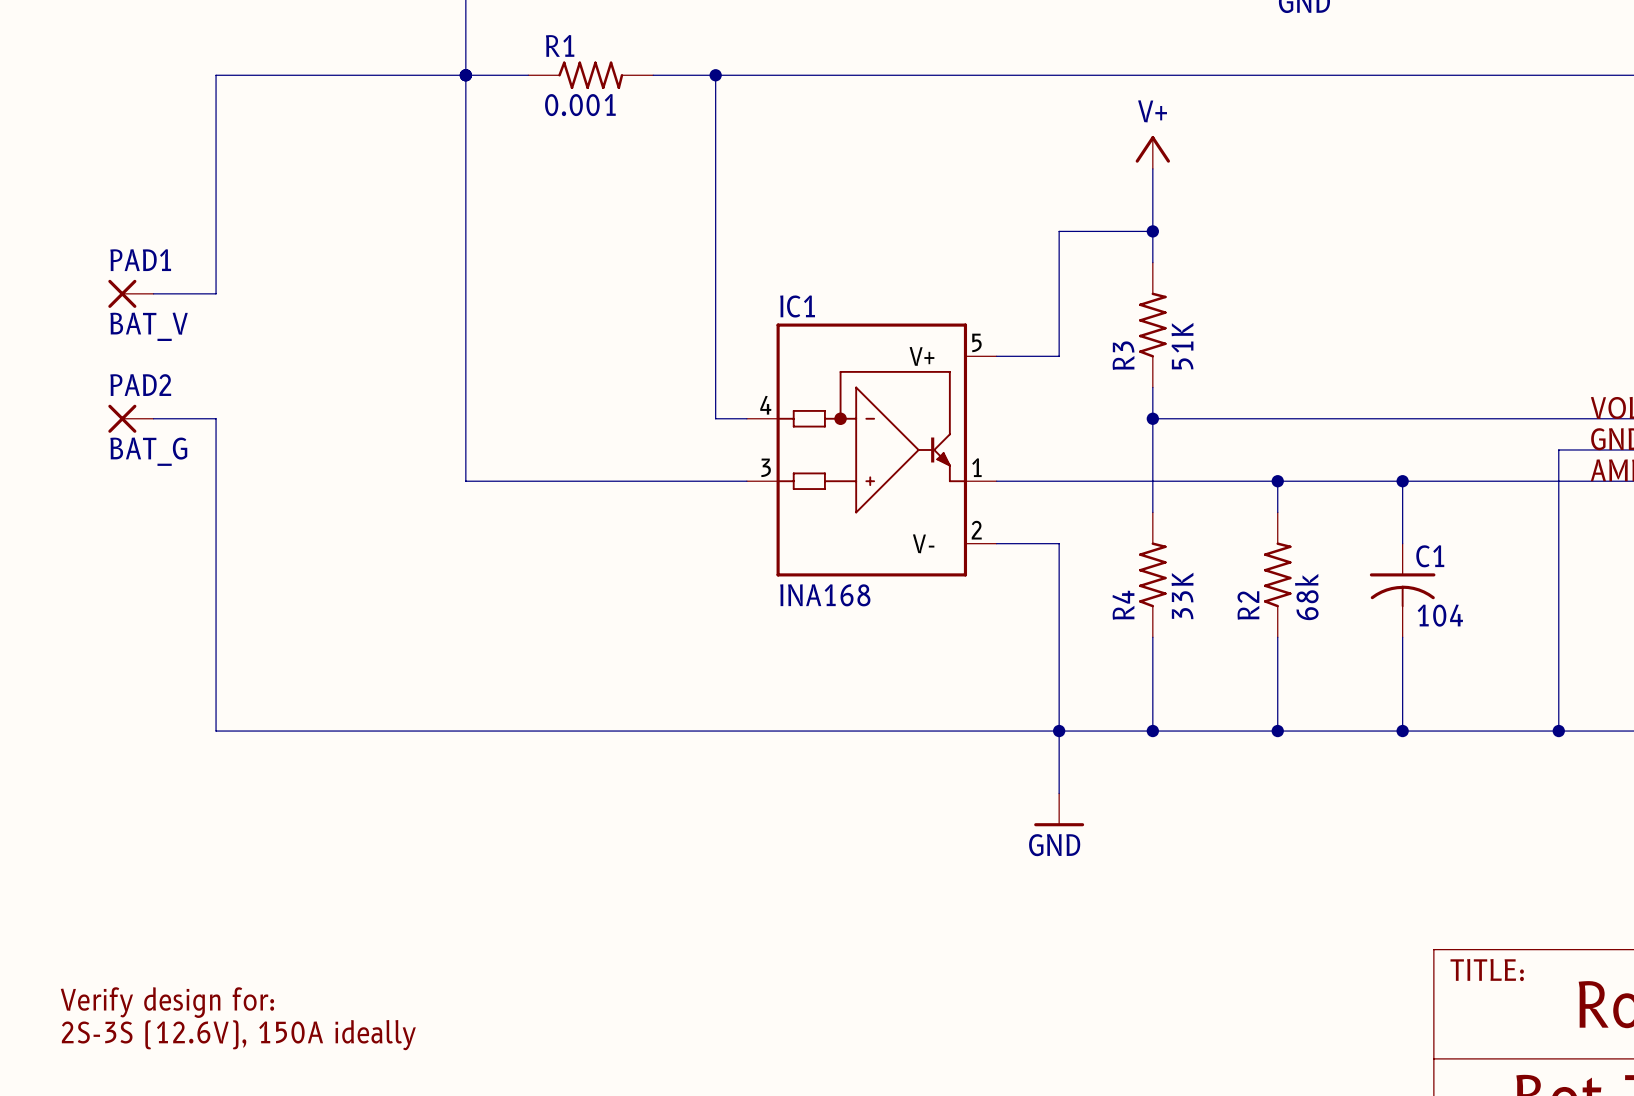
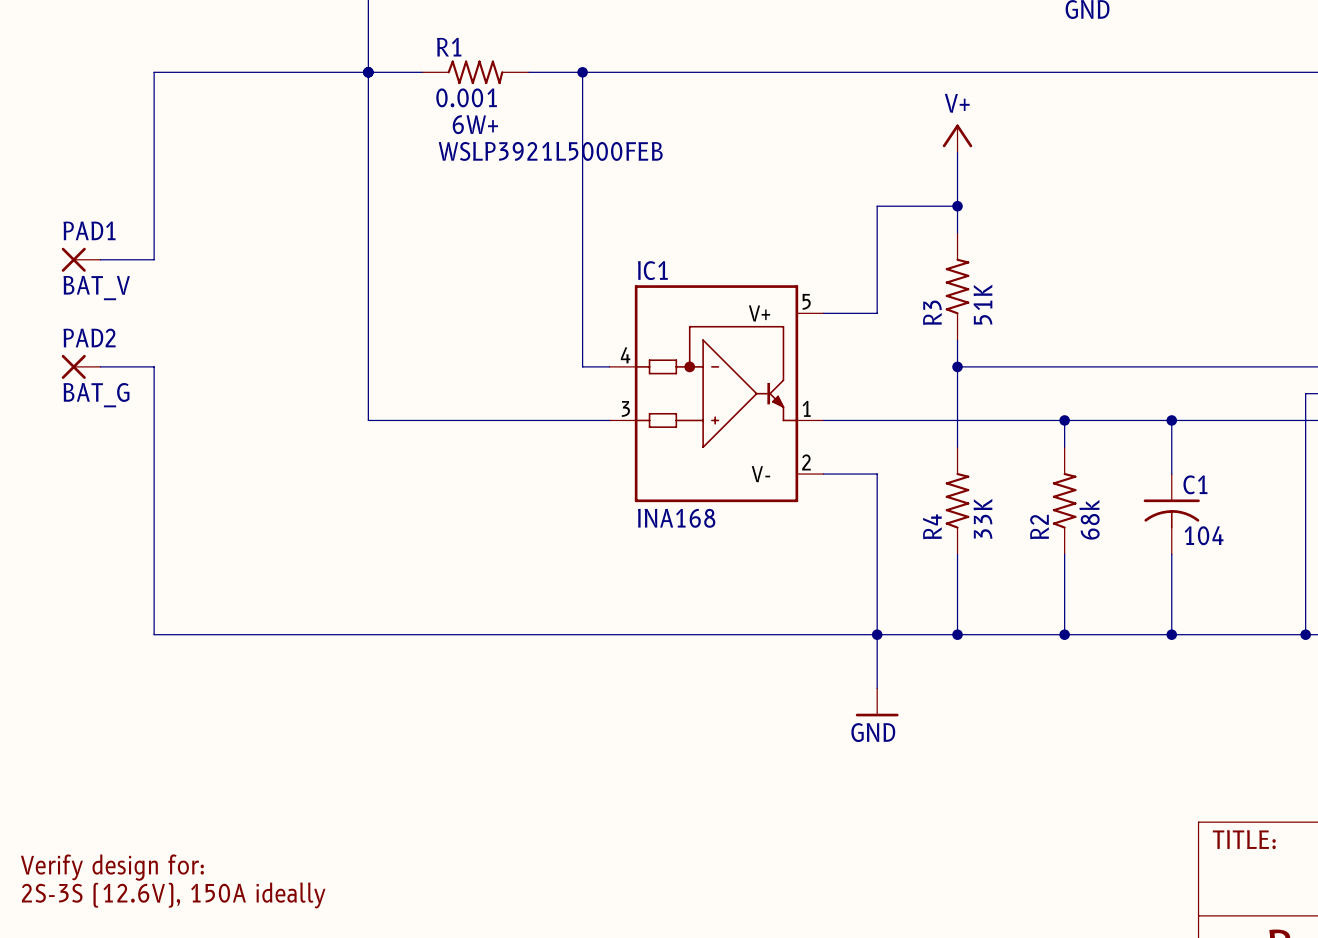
R1 text: none -> 6W+ (475, 124)
R1 text: none -> WSLP3921L5000FEB (550, 151)

